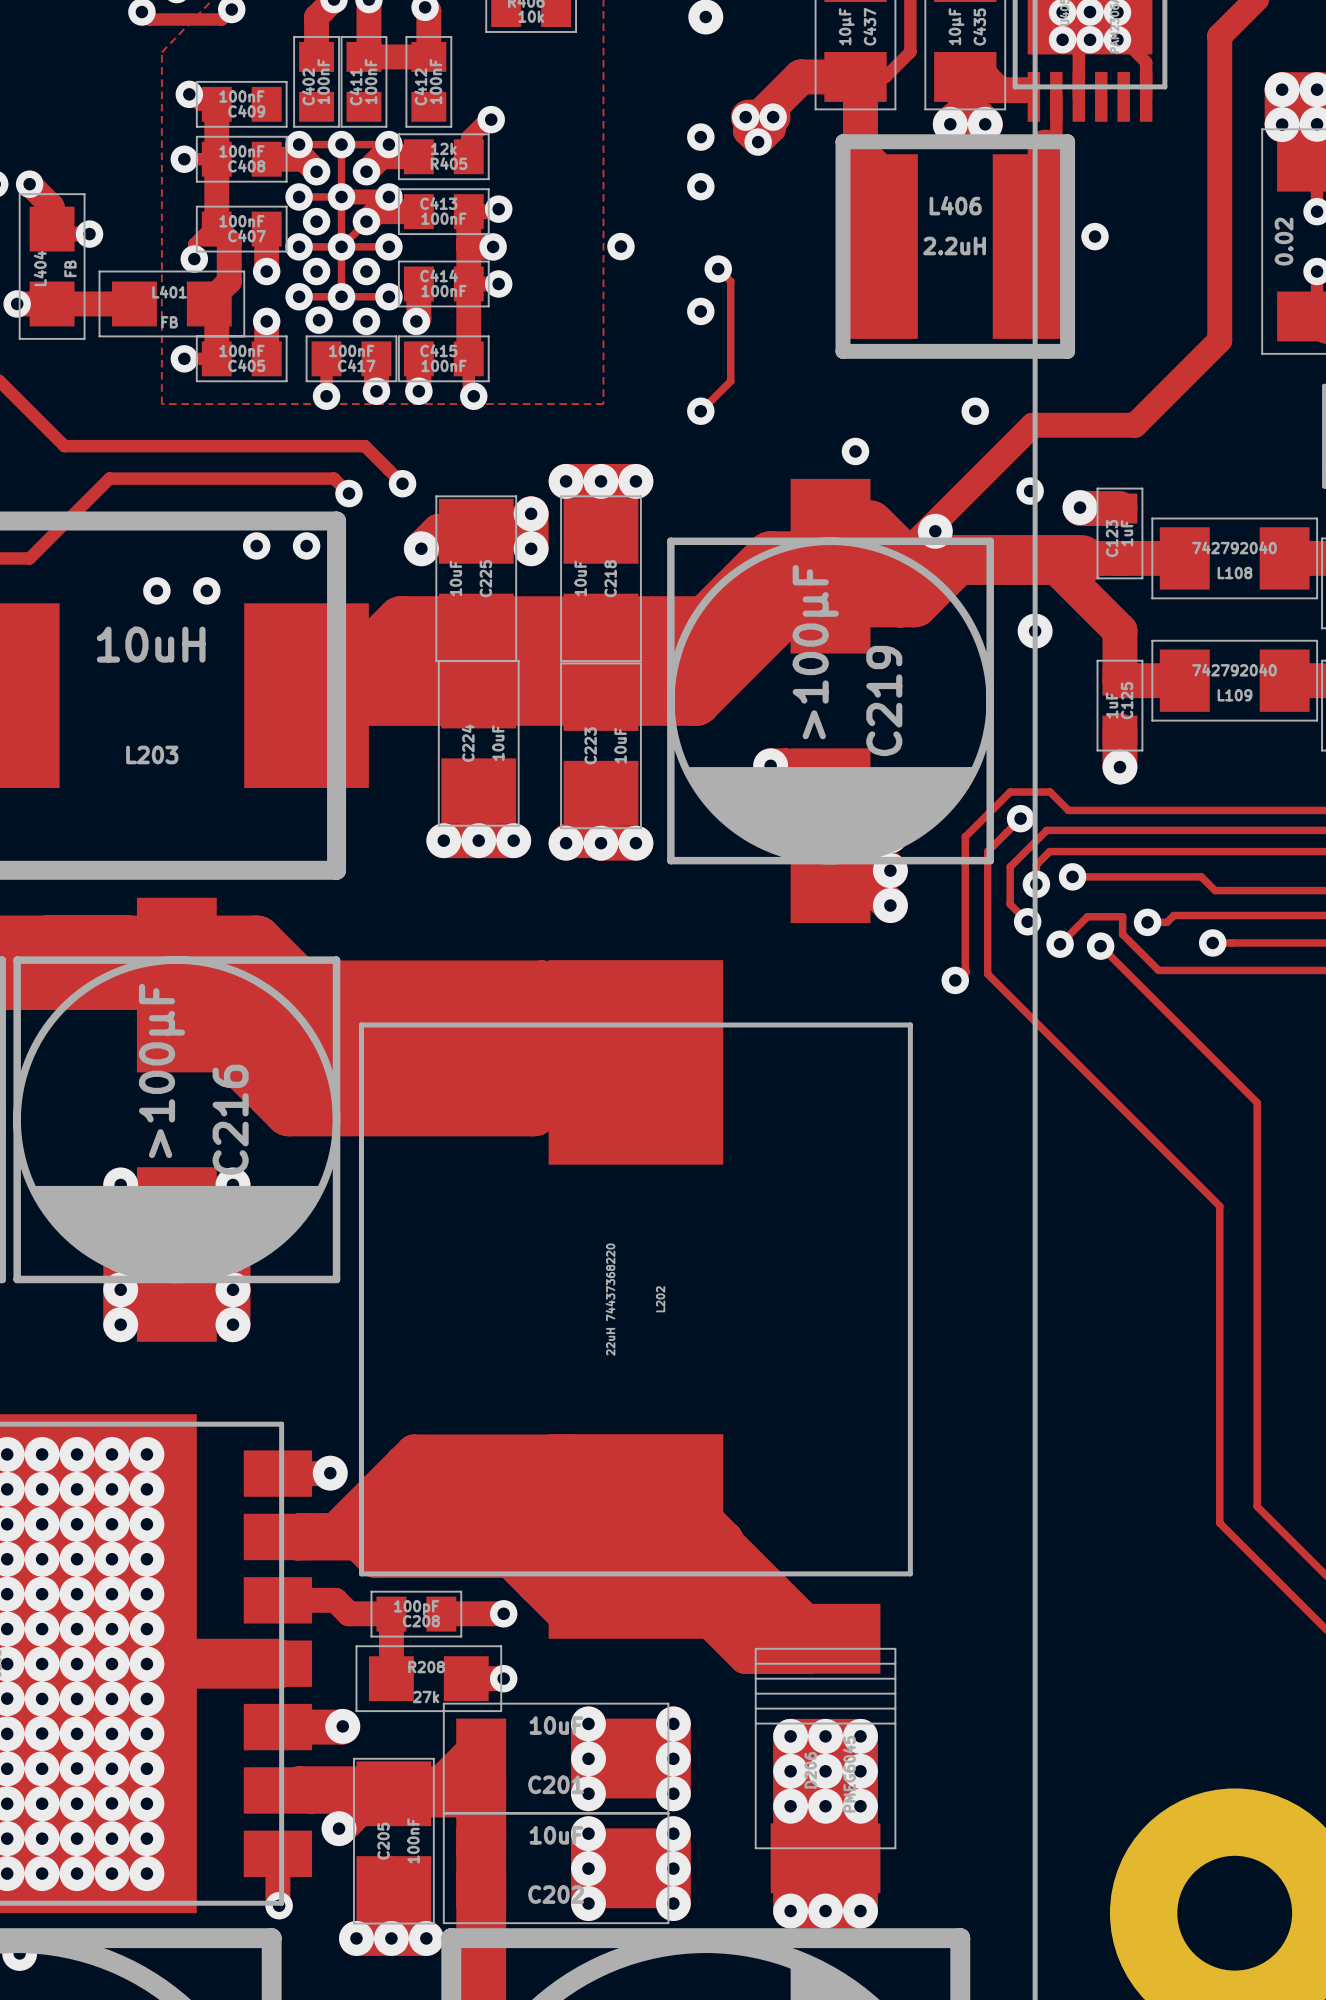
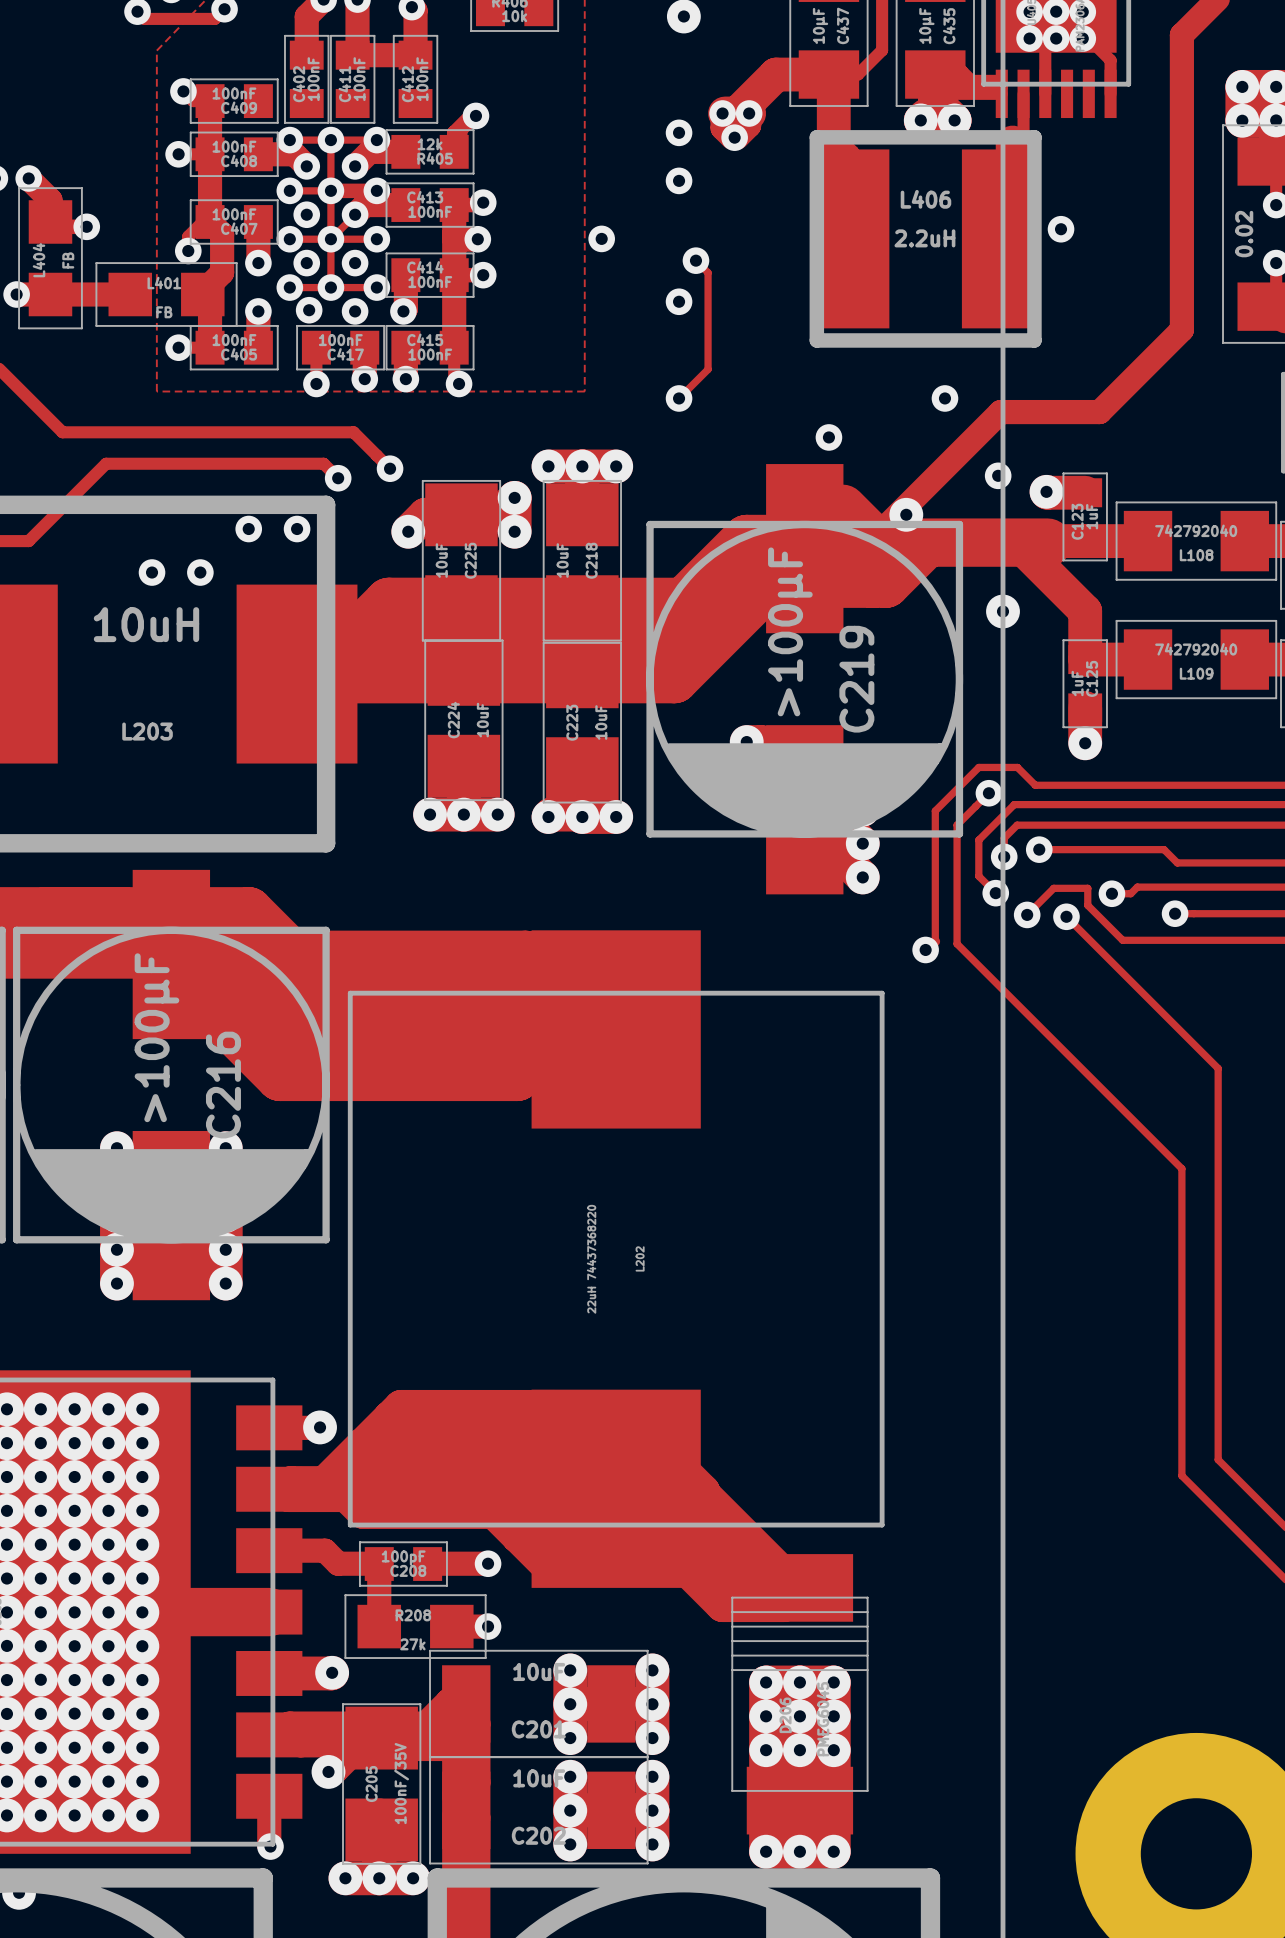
C205 value: 100nF (413, 1840) -> 100nF/35V (401, 1783)

